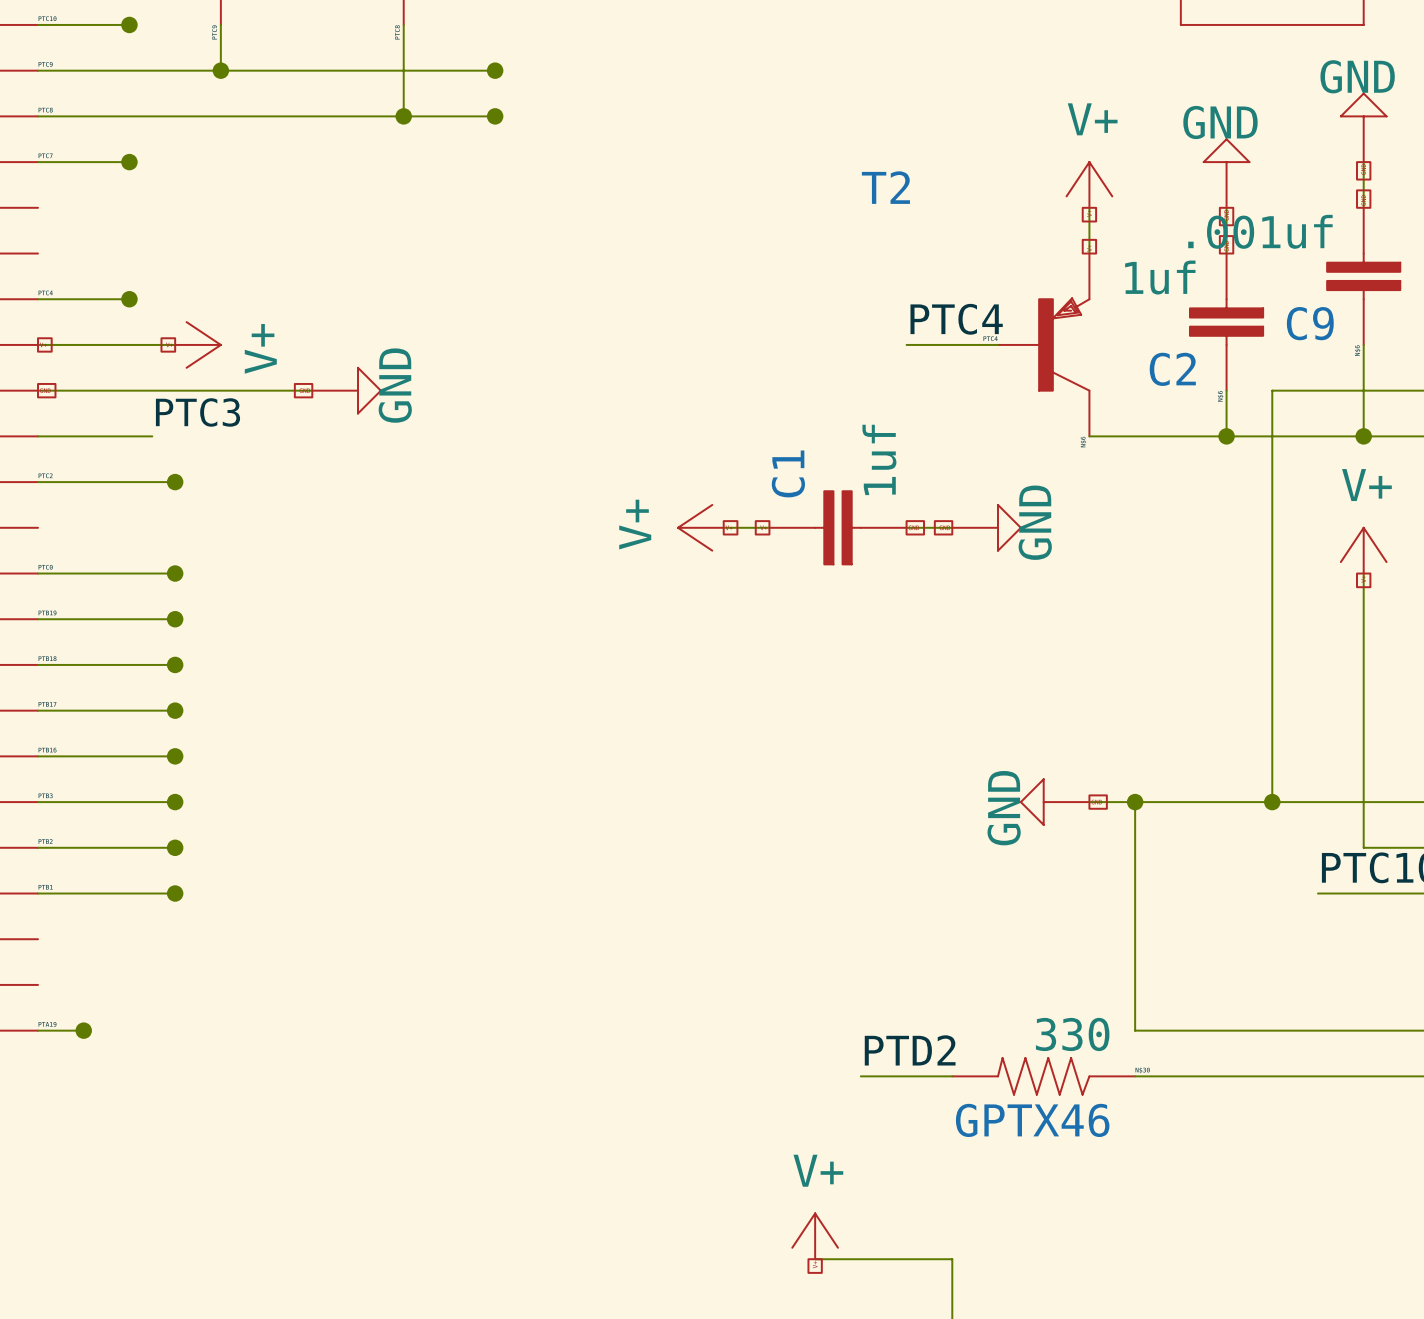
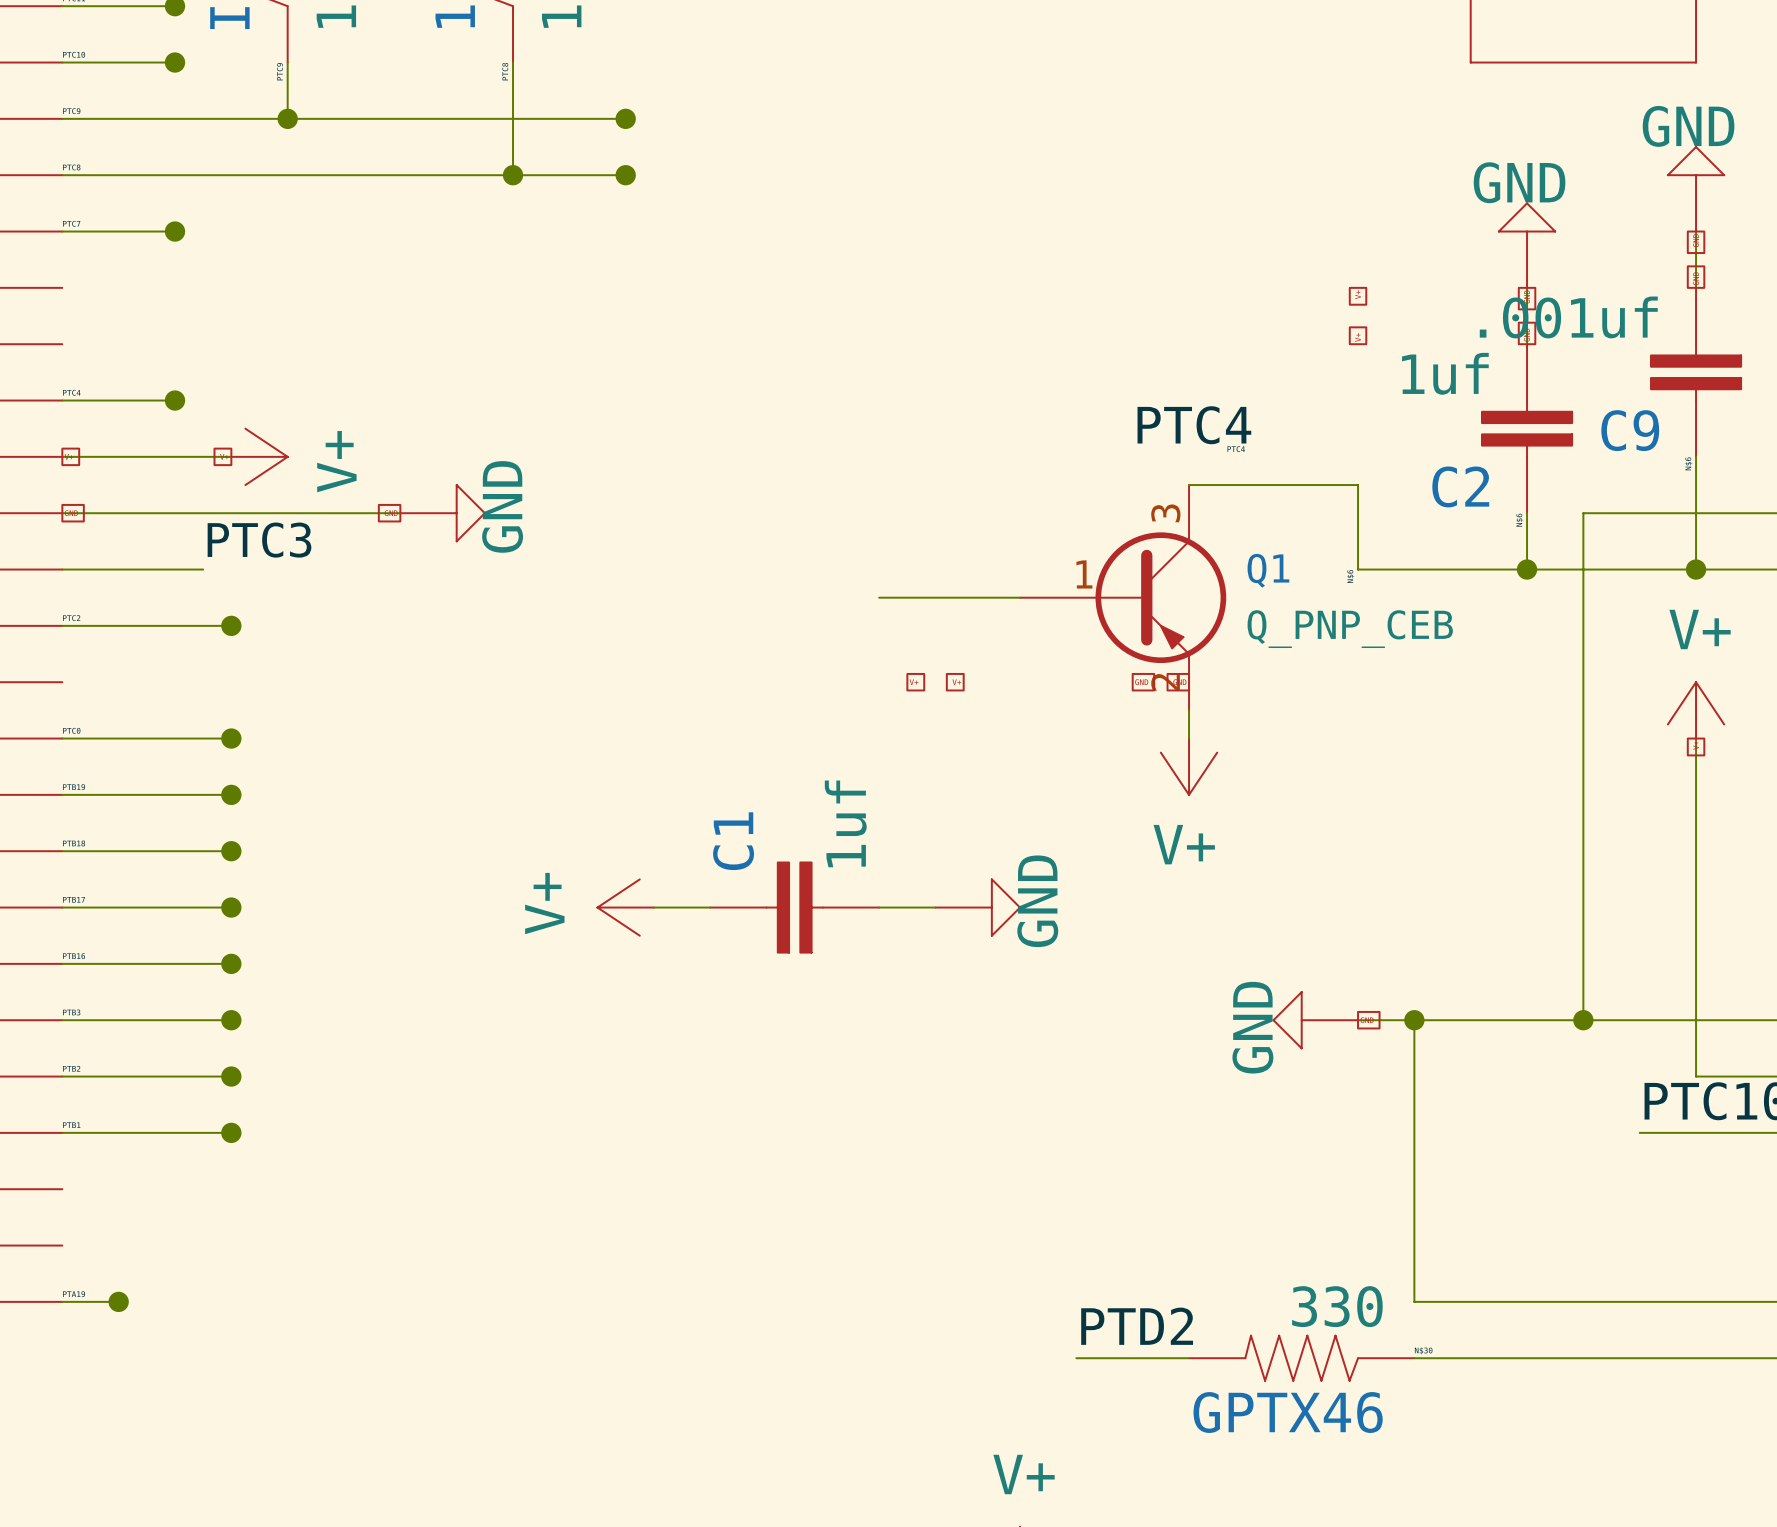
power symbol: V+ (1089, 184) -> none
wire: (1089, 207) (1089, 253) -> none
wire: (906, 344) (997, 344) -> none
T2: (1043, 344) -> none
wire: none -> (1189, 485) (1358, 485) (1358, 569)
wire: none -> (879, 597) (1020, 597)
Q1: none -> Q_PNP_CEB (1123, 597)
power symbol: V+ (700, 527) -> none
wire: (723, 527) (769, 527) -> (653, 907) (710, 907)
C1 position: (838, 527) -> (794, 907)
wire: (906, 527) (952, 527) -> (879, 907) (935, 907)
power symbol position: GND (986, 527) -> GND (977, 907)
wire: none -> (1189, 710) (1189, 738)
power symbol: none -> V+ (1189, 766)
power symbol: none -> V+ (625, 907)

